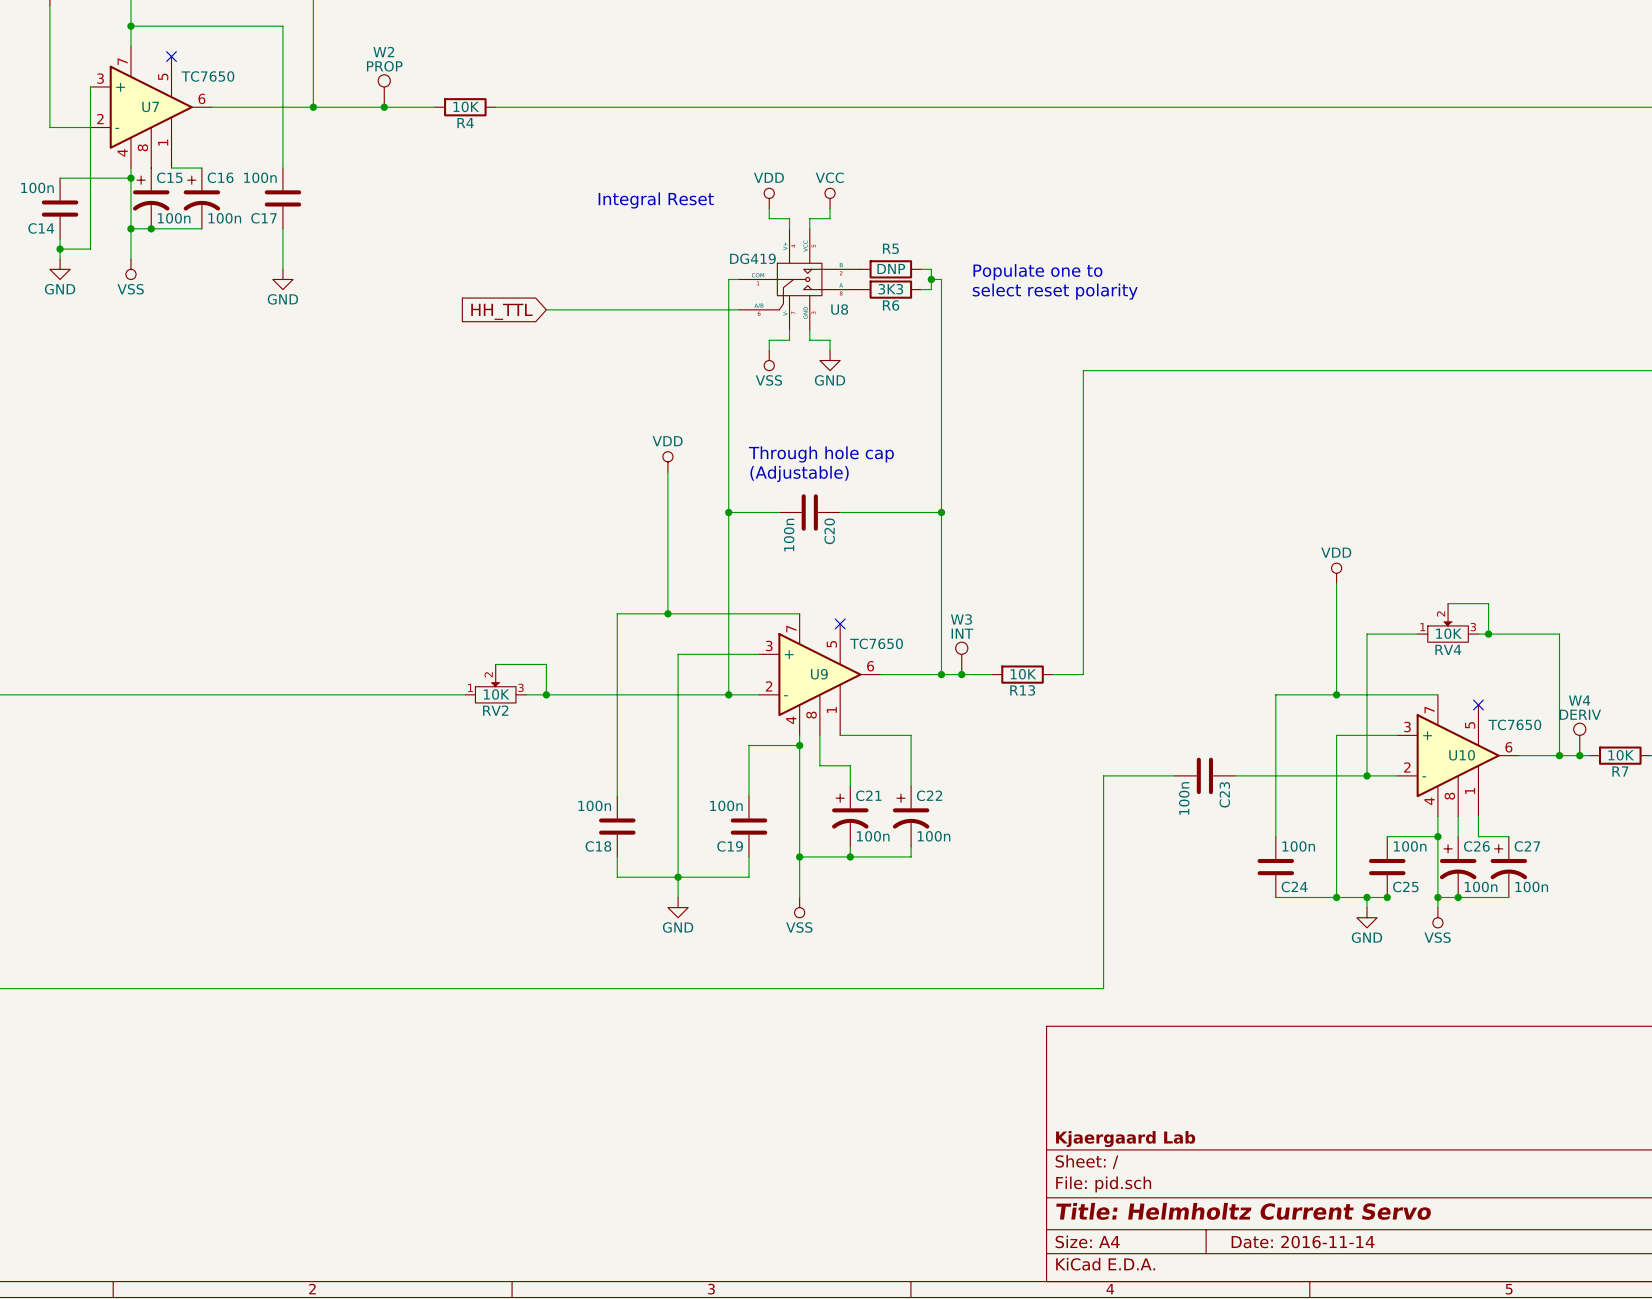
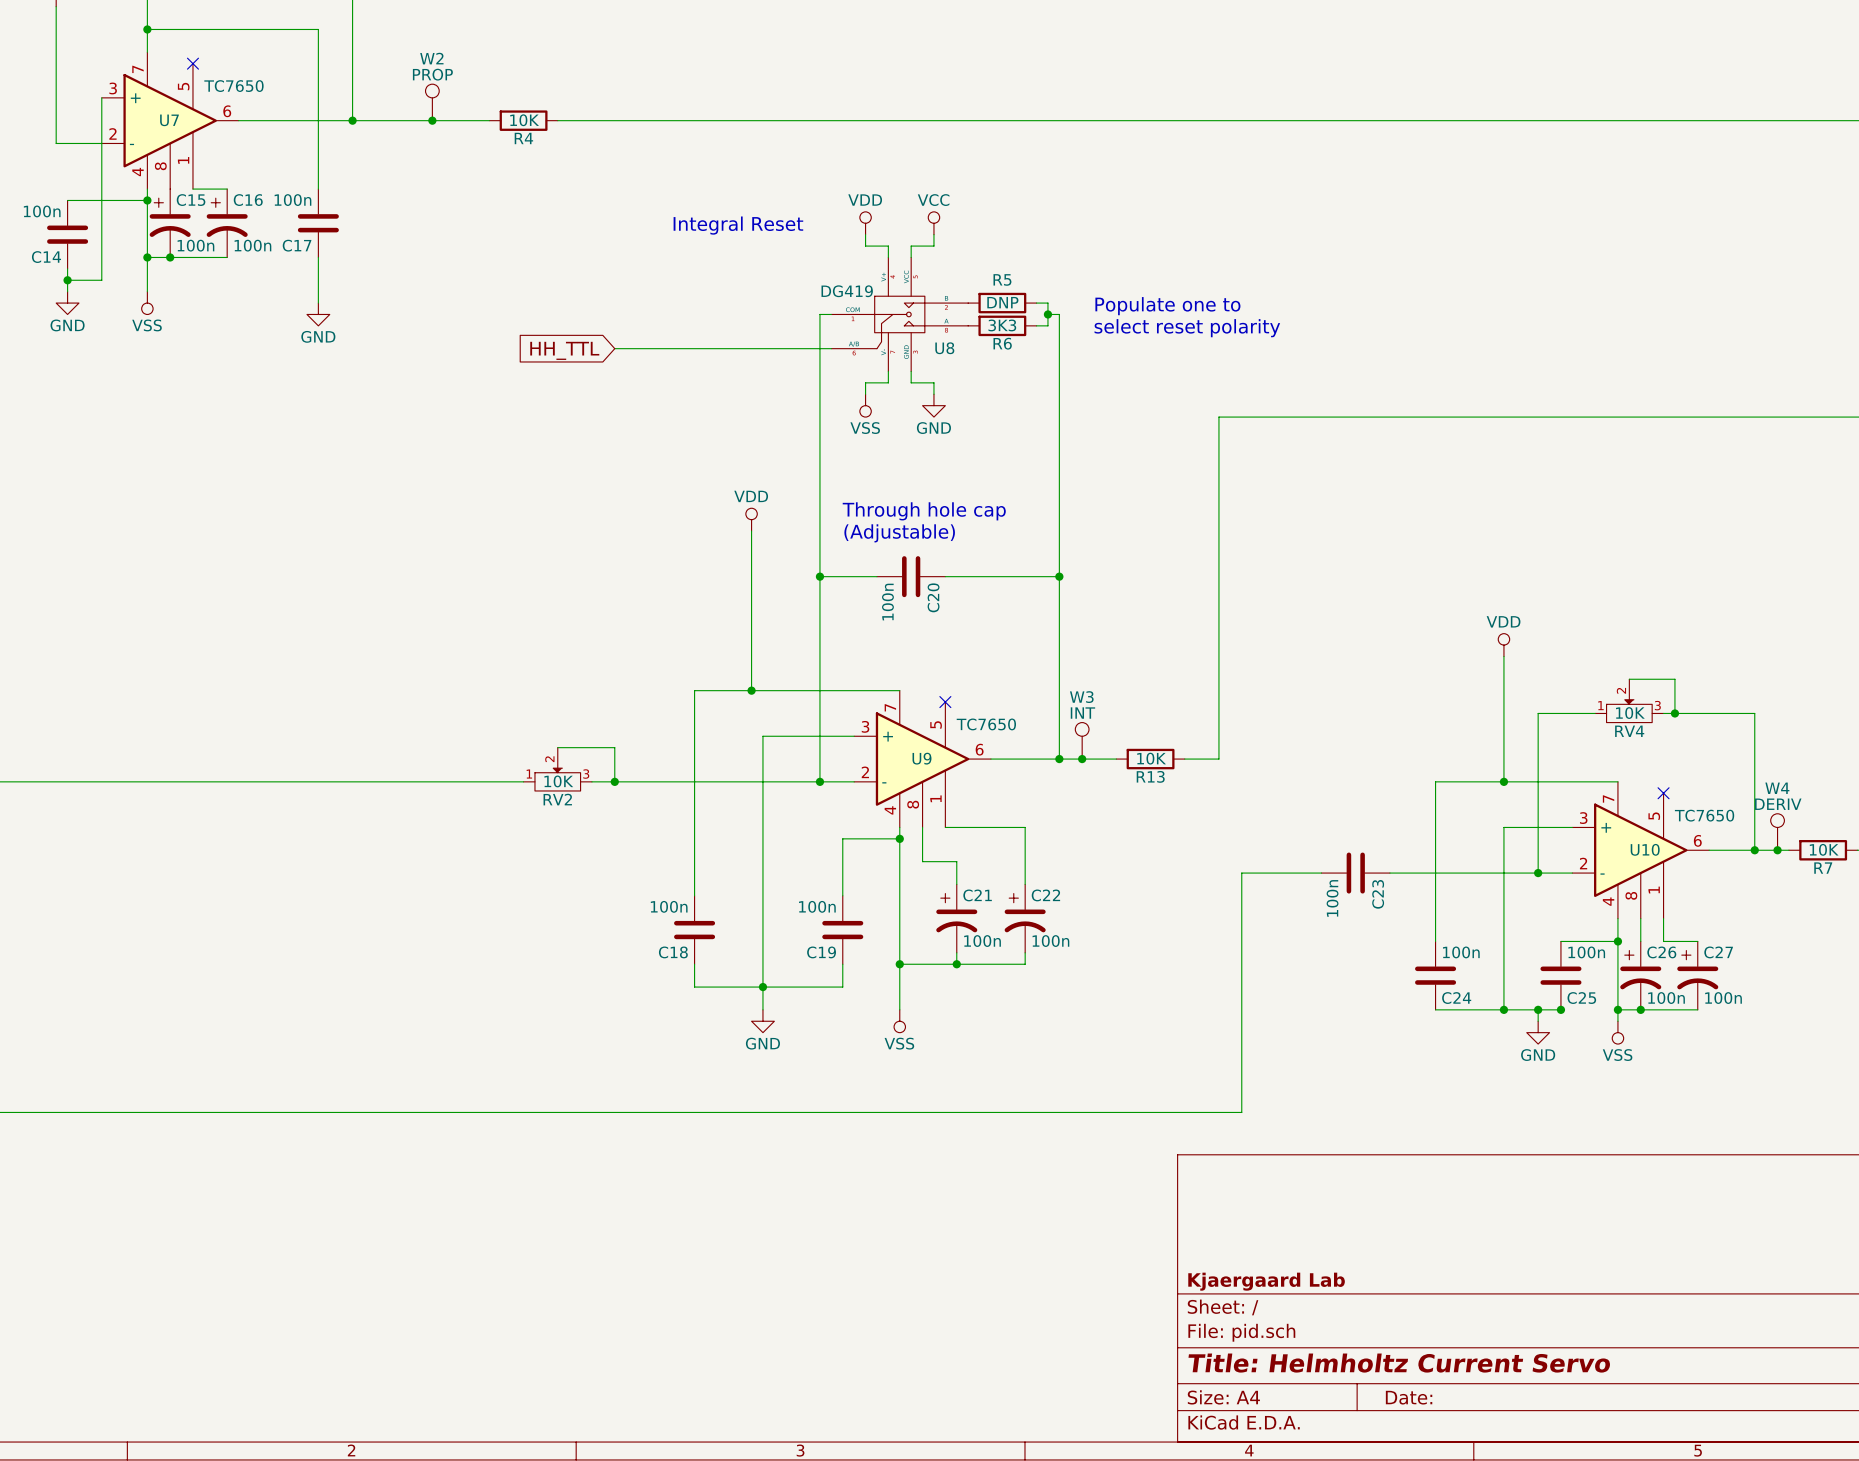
title block: Date: 2016-11-14 (1303, 1242) -> Date: (1409, 1397)

